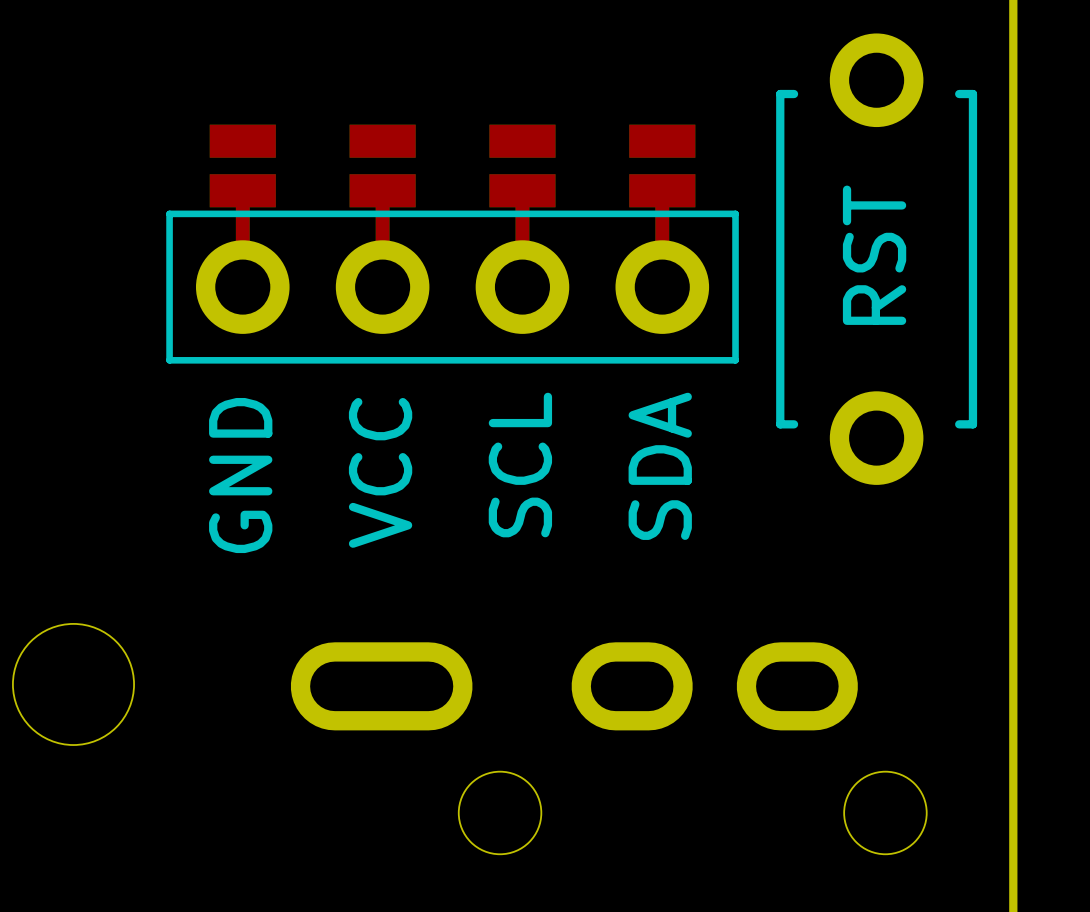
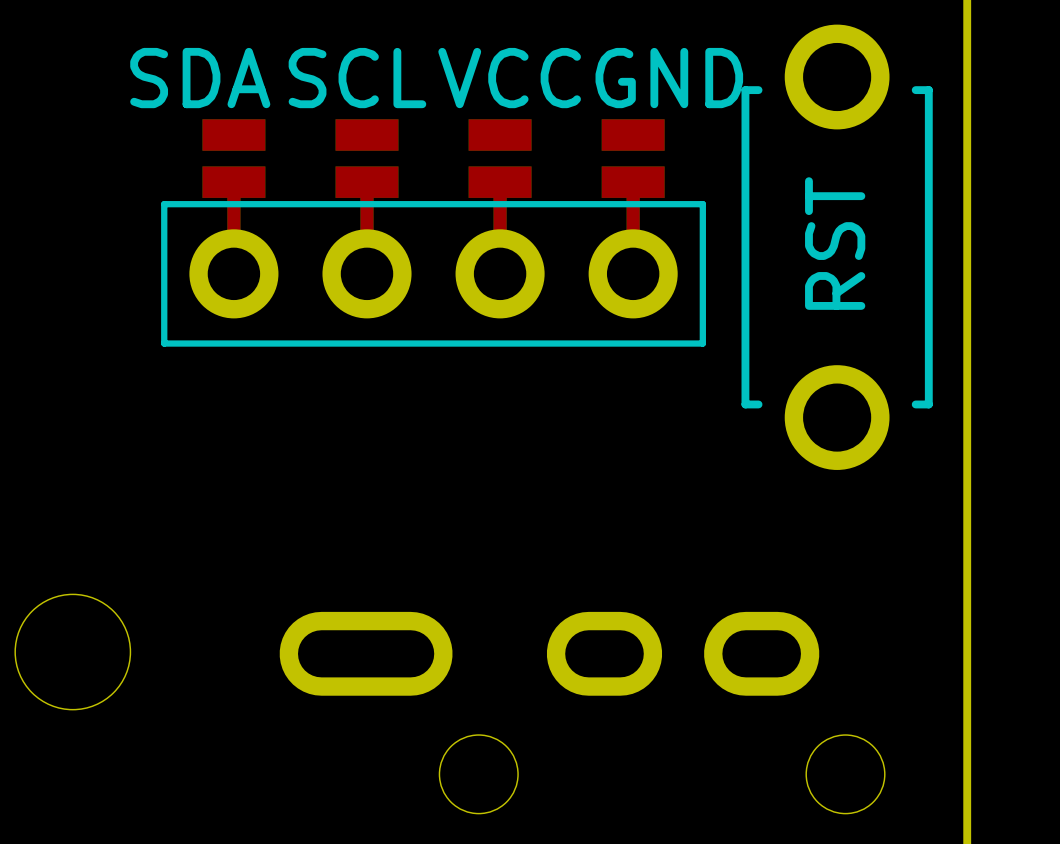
part footprint: [776, 33, 978, 485] -> [741, 24, 933, 470]
part text rotation: 0° (520, 465) -> 90° clockwise (357, 78)
part text position: SCL (520, 465) -> SCL (357, 78)
part text rotation: 0° (660, 466) -> 90° clockwise (200, 78)
part text position: SDA (660, 466) -> SDA (200, 78)
part text rotation: 0° (380, 472) -> 90° clockwise (509, 78)
part text position: VCC (380, 472) -> VCC (509, 78)
part text rotation: 0° (240, 475) -> 90° clockwise (669, 78)
part text position: GND (240, 475) -> GND (669, 78)

